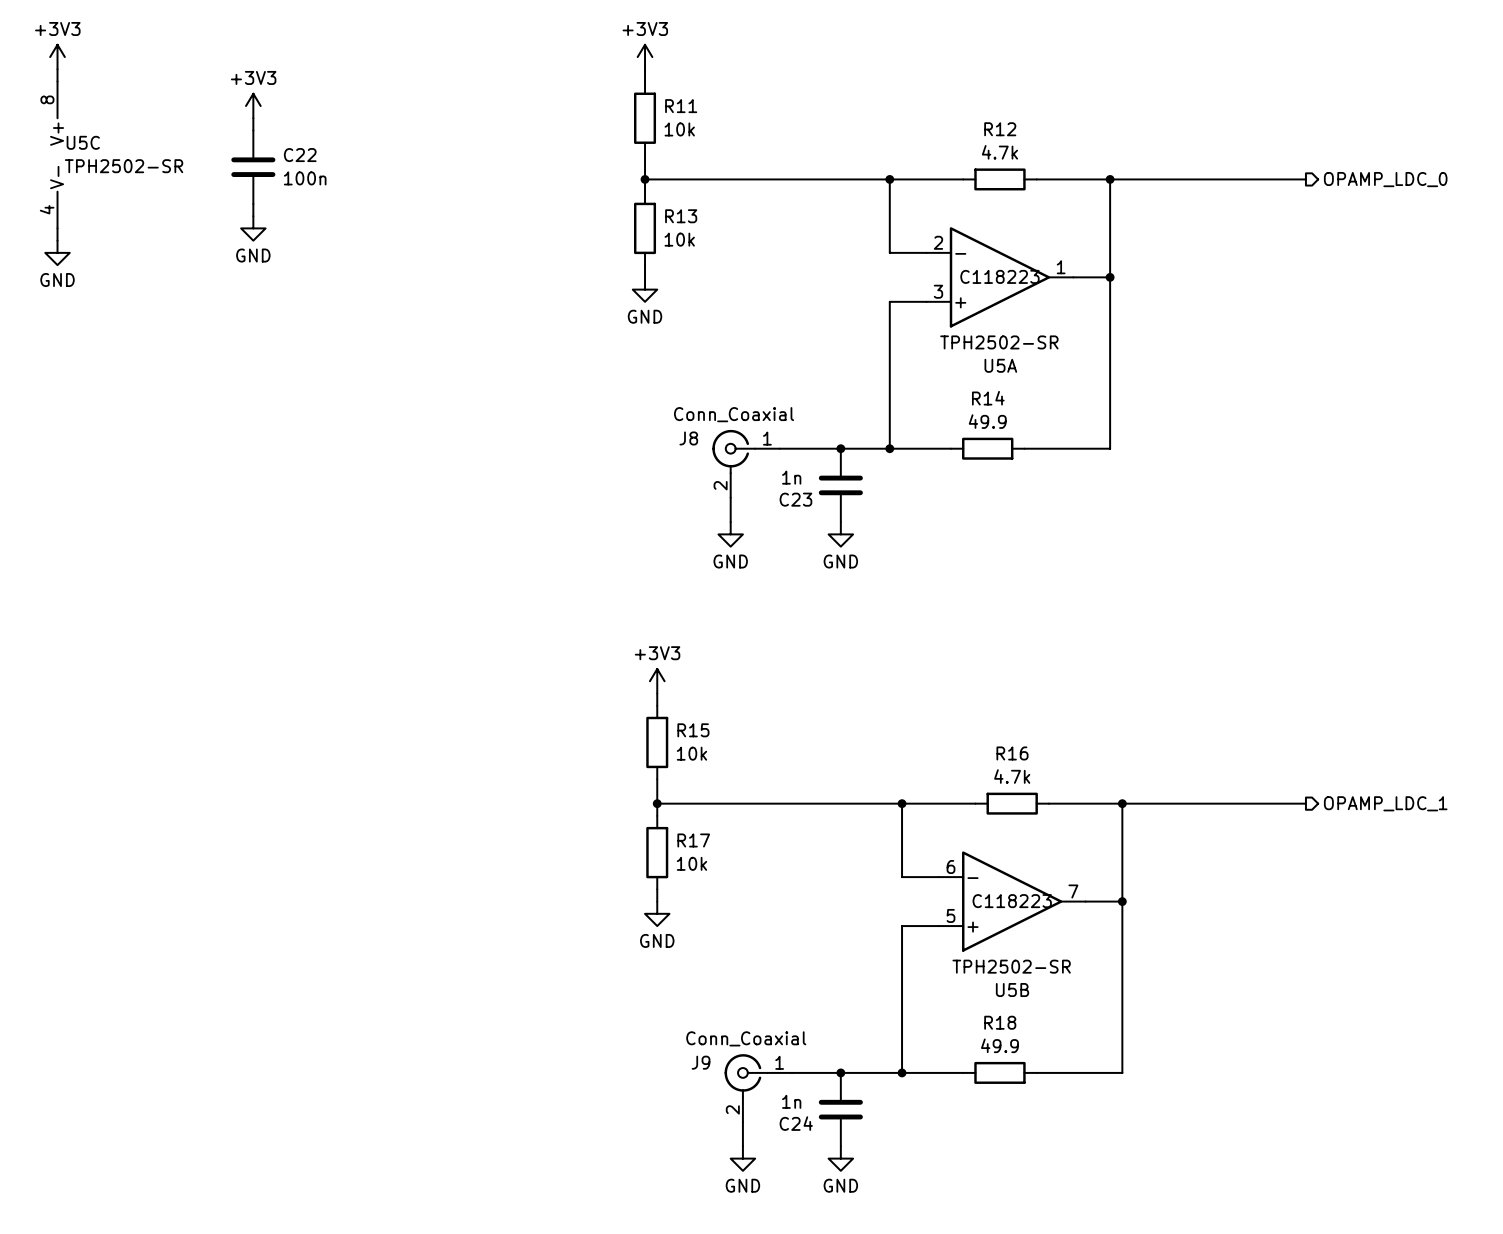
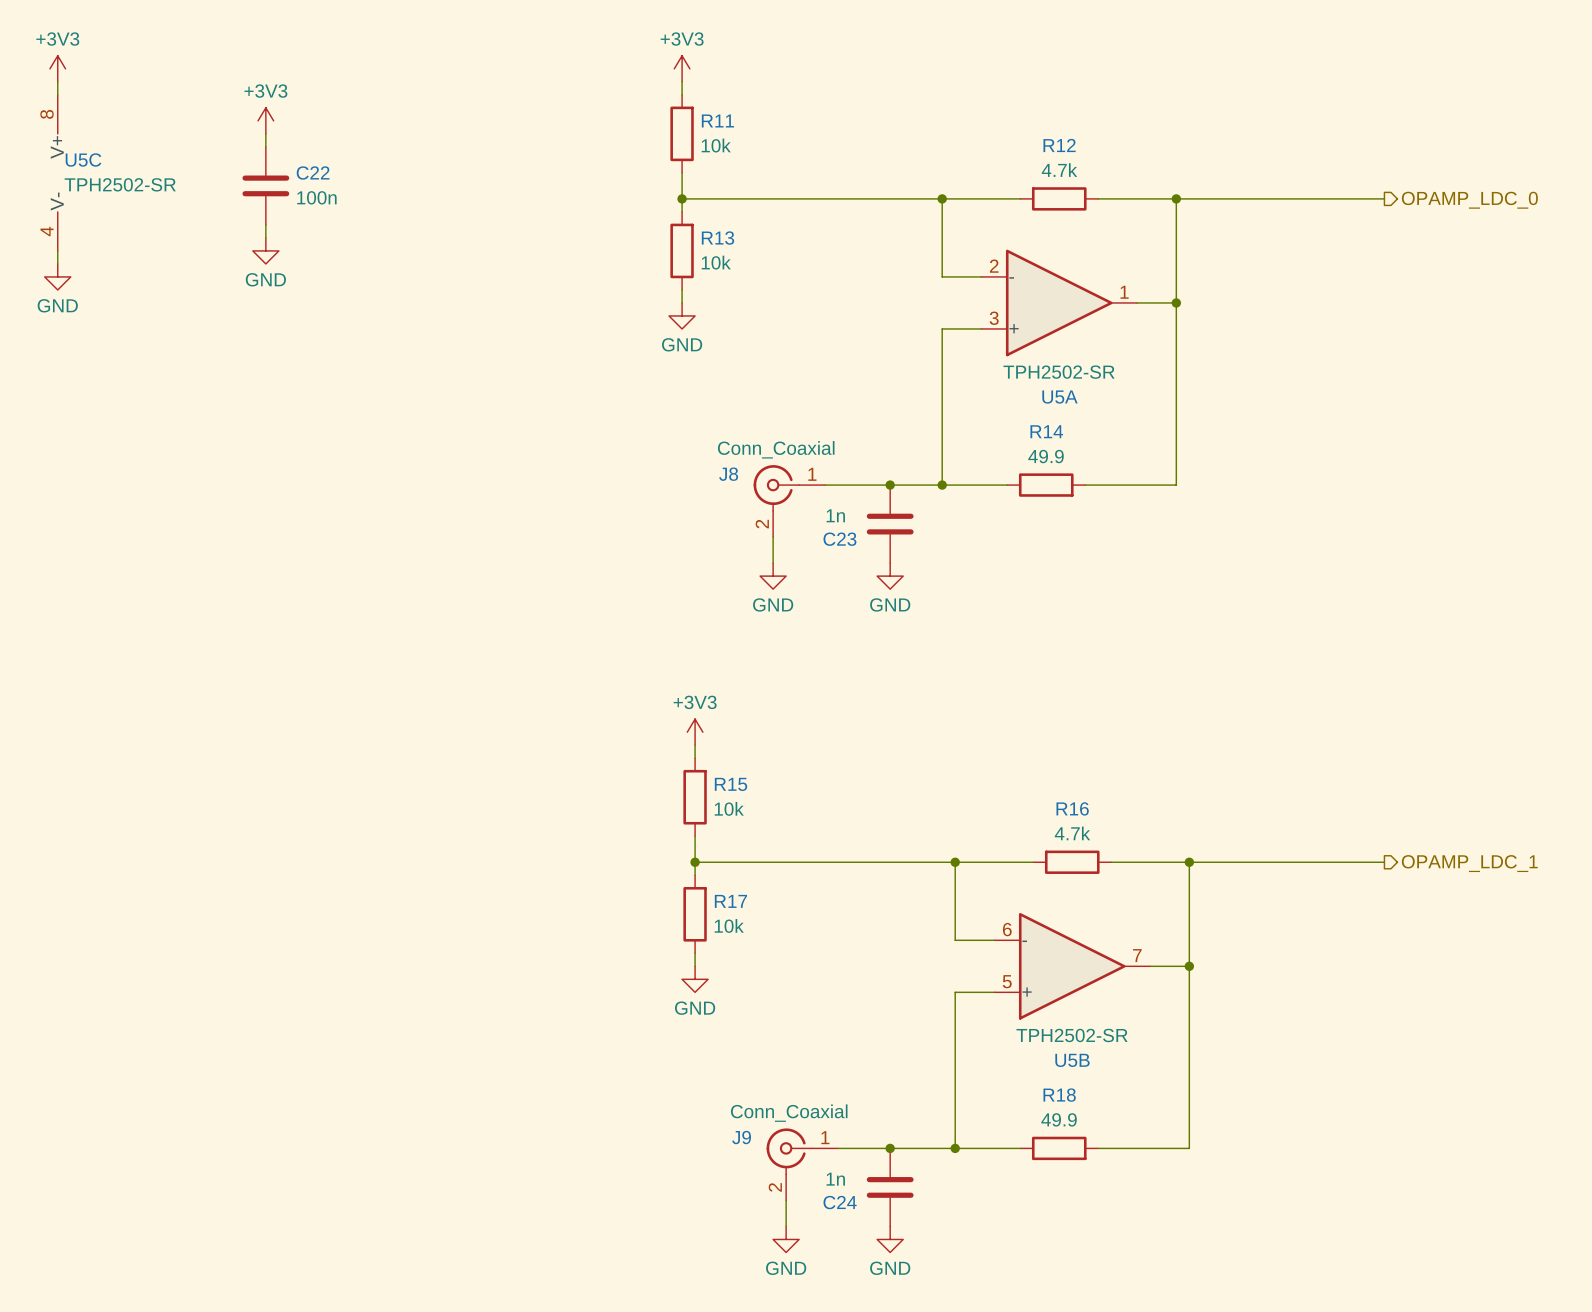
U5A text: C118223 (999, 276) -> none
U5B text: C118223 (1012, 901) -> none

